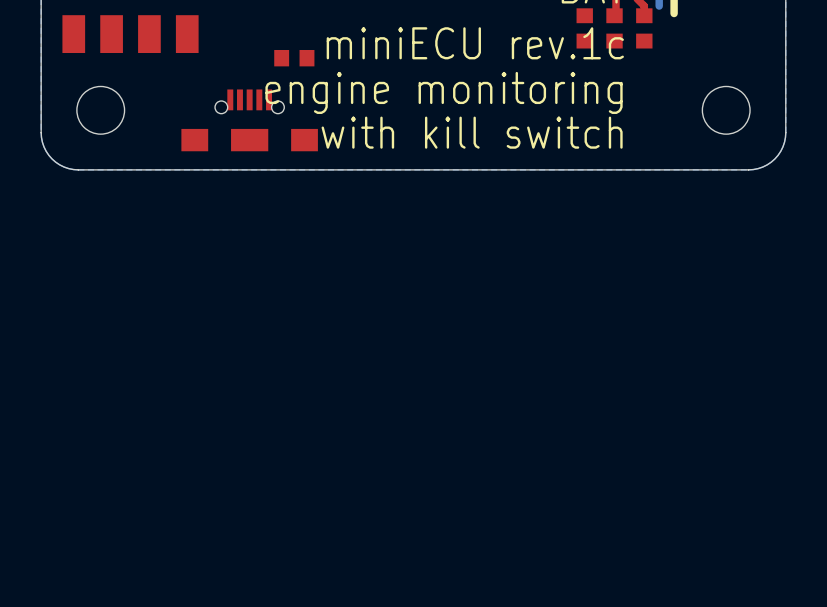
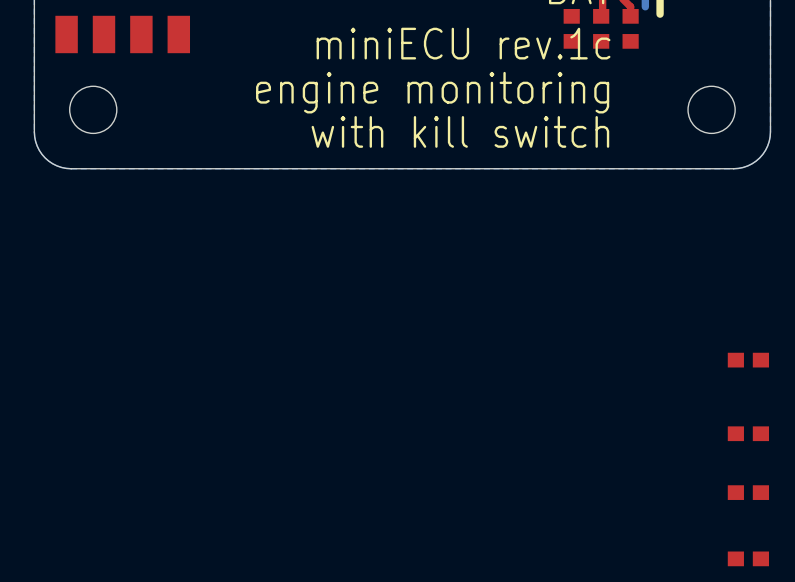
part: (294, 58) -> none
part: (249, 120) -> none
part: none -> (748, 360)
part: none -> (748, 433)
part: none -> (748, 492)
part: none -> (748, 558)

